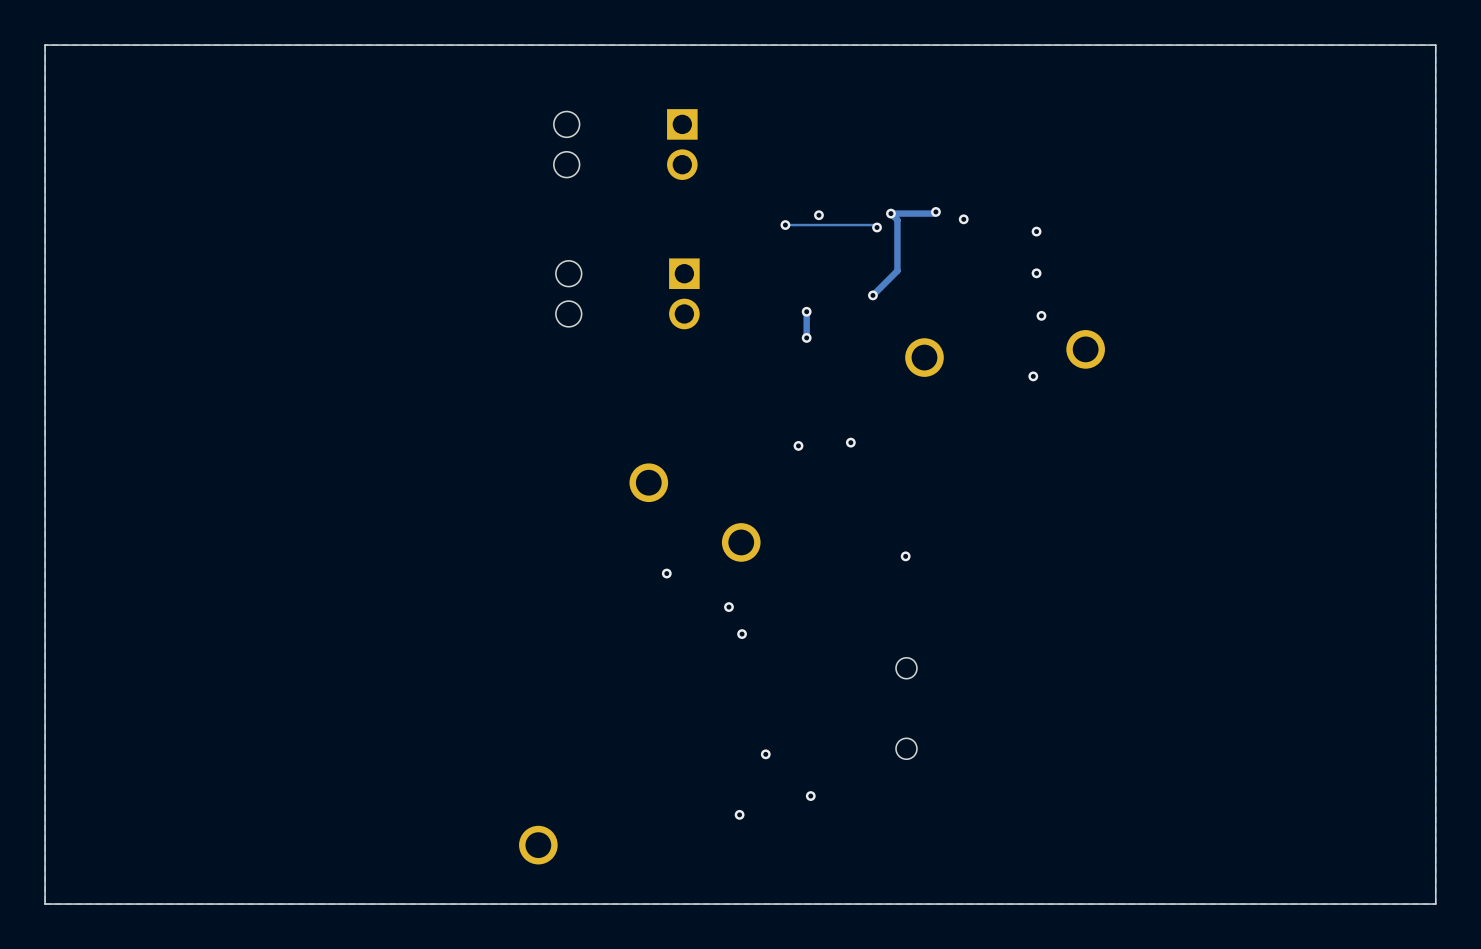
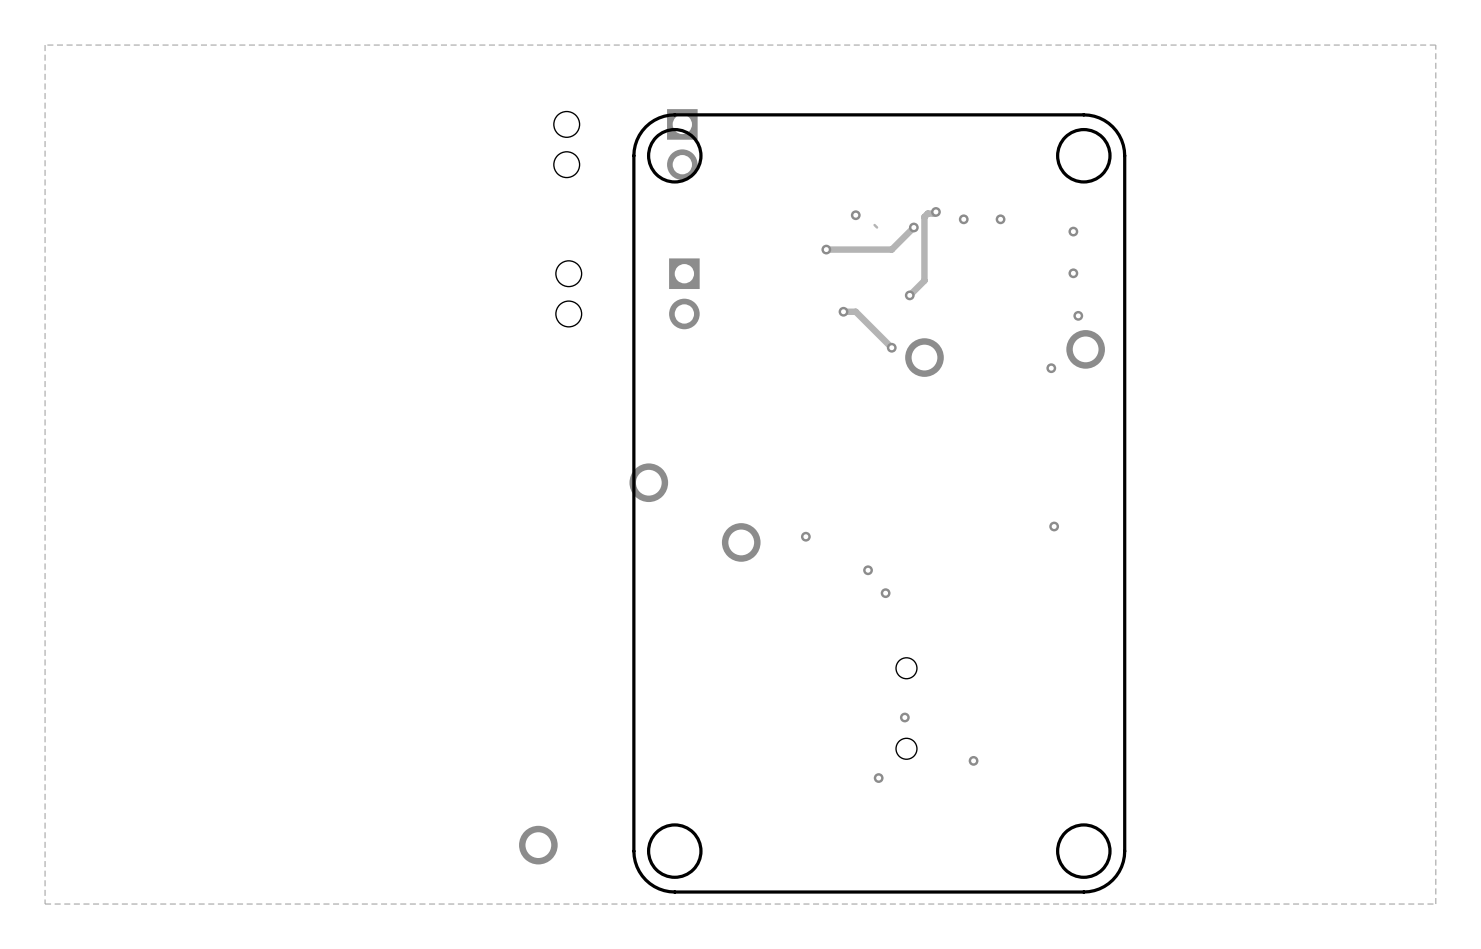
board edge: (1435, 45) (1435, 904) (45, 904) (45, 45) (1435, 45) -> none
board edge: none -> (1083, 114) (674, 114) (654, 120) (639, 135) (633, 155) (633, 851) (639, 871) (654, 886) (674, 892) (1083, 892) (1104, 886) (1119, 871) (1124, 851) (1124, 155) (1121, 140) (1112, 126) (1099, 117) (1083, 114)
round board edge: none -> [646, 127, 703, 184]
round board edge: none -> [1056, 127, 1112, 184]
via: (890, 213) -> none
track: (927, 213) (890, 213) (897, 220) (897, 270) (872, 295) -> (927, 213) (924, 216) (924, 280) (909, 295)
via: (818, 215) -> none
via: none -> (855, 215)
via: none -> (1000, 219)
via: (785, 225) -> none
track: (874, 225) (785, 225) -> none
via: (877, 227) -> none
track: none -> (913, 227) (891, 249) (826, 249)
via: none -> (913, 227)
via: (1036, 231) -> none
via: none -> (1073, 231)
via: none -> (826, 249)
via: (1036, 273) -> none
via: none -> (1073, 273)
via: (872, 295) -> none
via: none -> (909, 295)
track: (806, 311) (806, 336) -> none
via: (806, 311) -> none
track: none -> (843, 311) (855, 311) (891, 347)
via: none -> (843, 311)
via: (1041, 315) -> none
via: none -> (1078, 315)
via: (806, 337) -> none
via: none -> (891, 347)
via position: (1033, 376) -> (1051, 368)
via: (850, 442) -> none
via: (798, 445) -> none
via: none -> (1054, 526)
via: none -> (805, 536)
via: (905, 556) -> none
via: none -> (868, 570)
via: (666, 573) -> none
via: none -> (885, 593)
via: (728, 607) -> none
via: (742, 634) -> none
via: none -> (904, 717)
via: (765, 754) -> none
via: none -> (973, 760)
via: none -> (878, 778)
via: (810, 796) -> none
via: (739, 814) -> none
round board edge: none -> [646, 823, 703, 879]
round board edge: none -> [1056, 823, 1112, 879]

